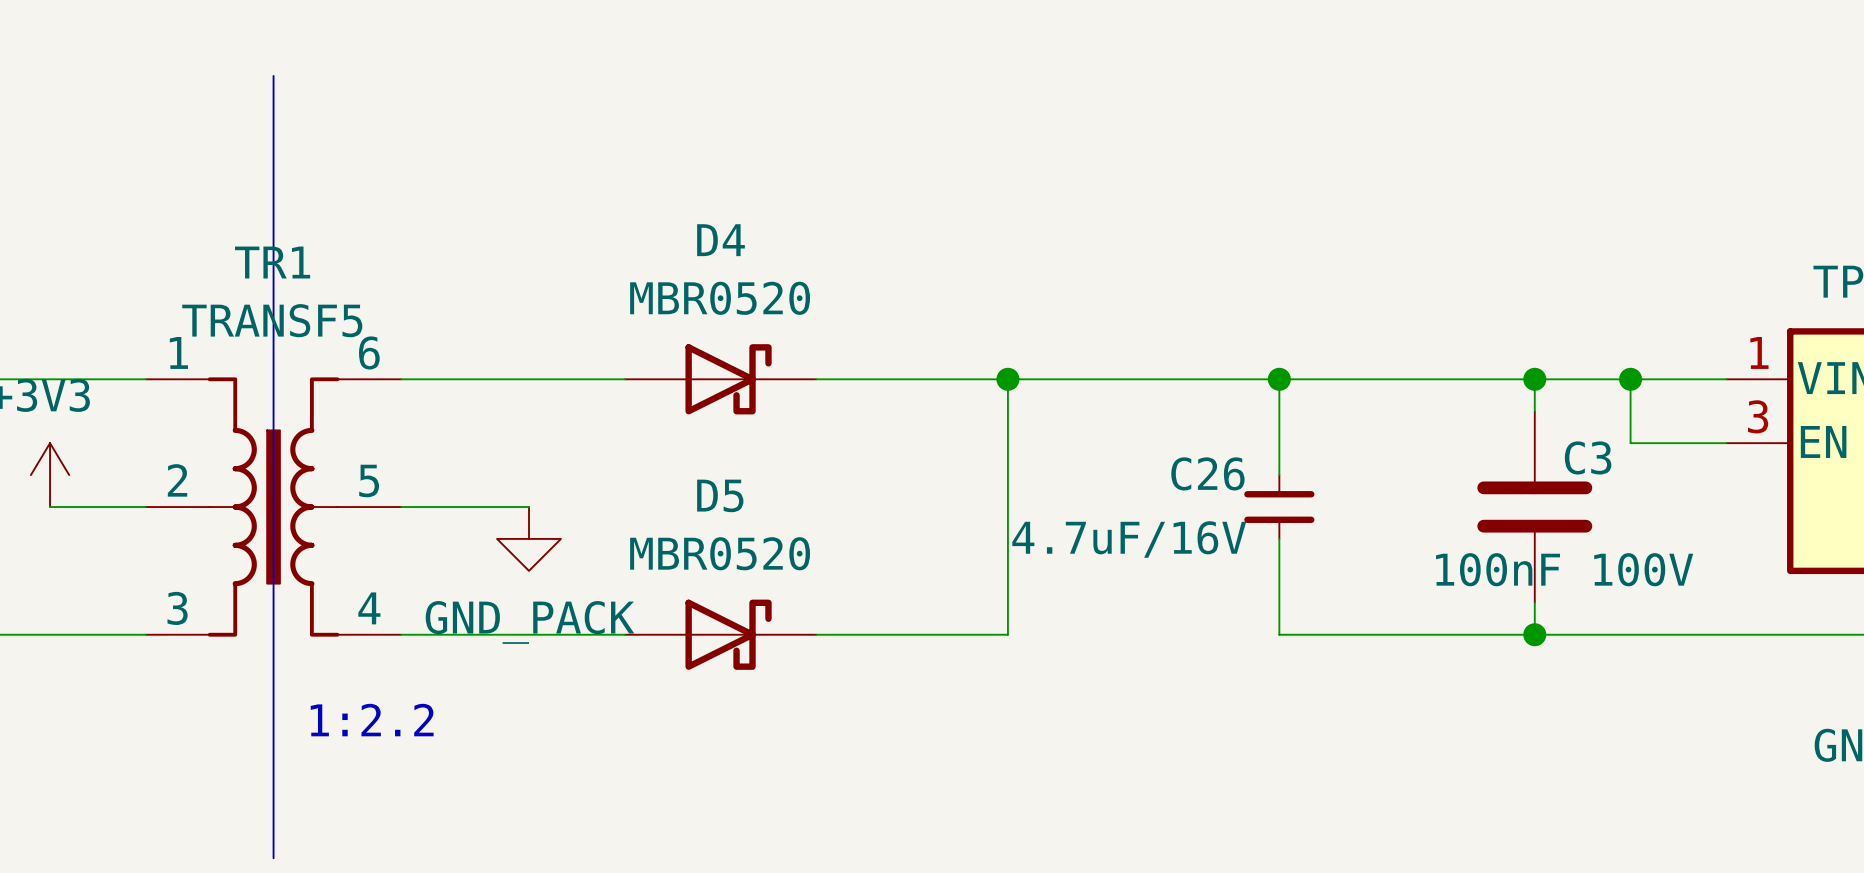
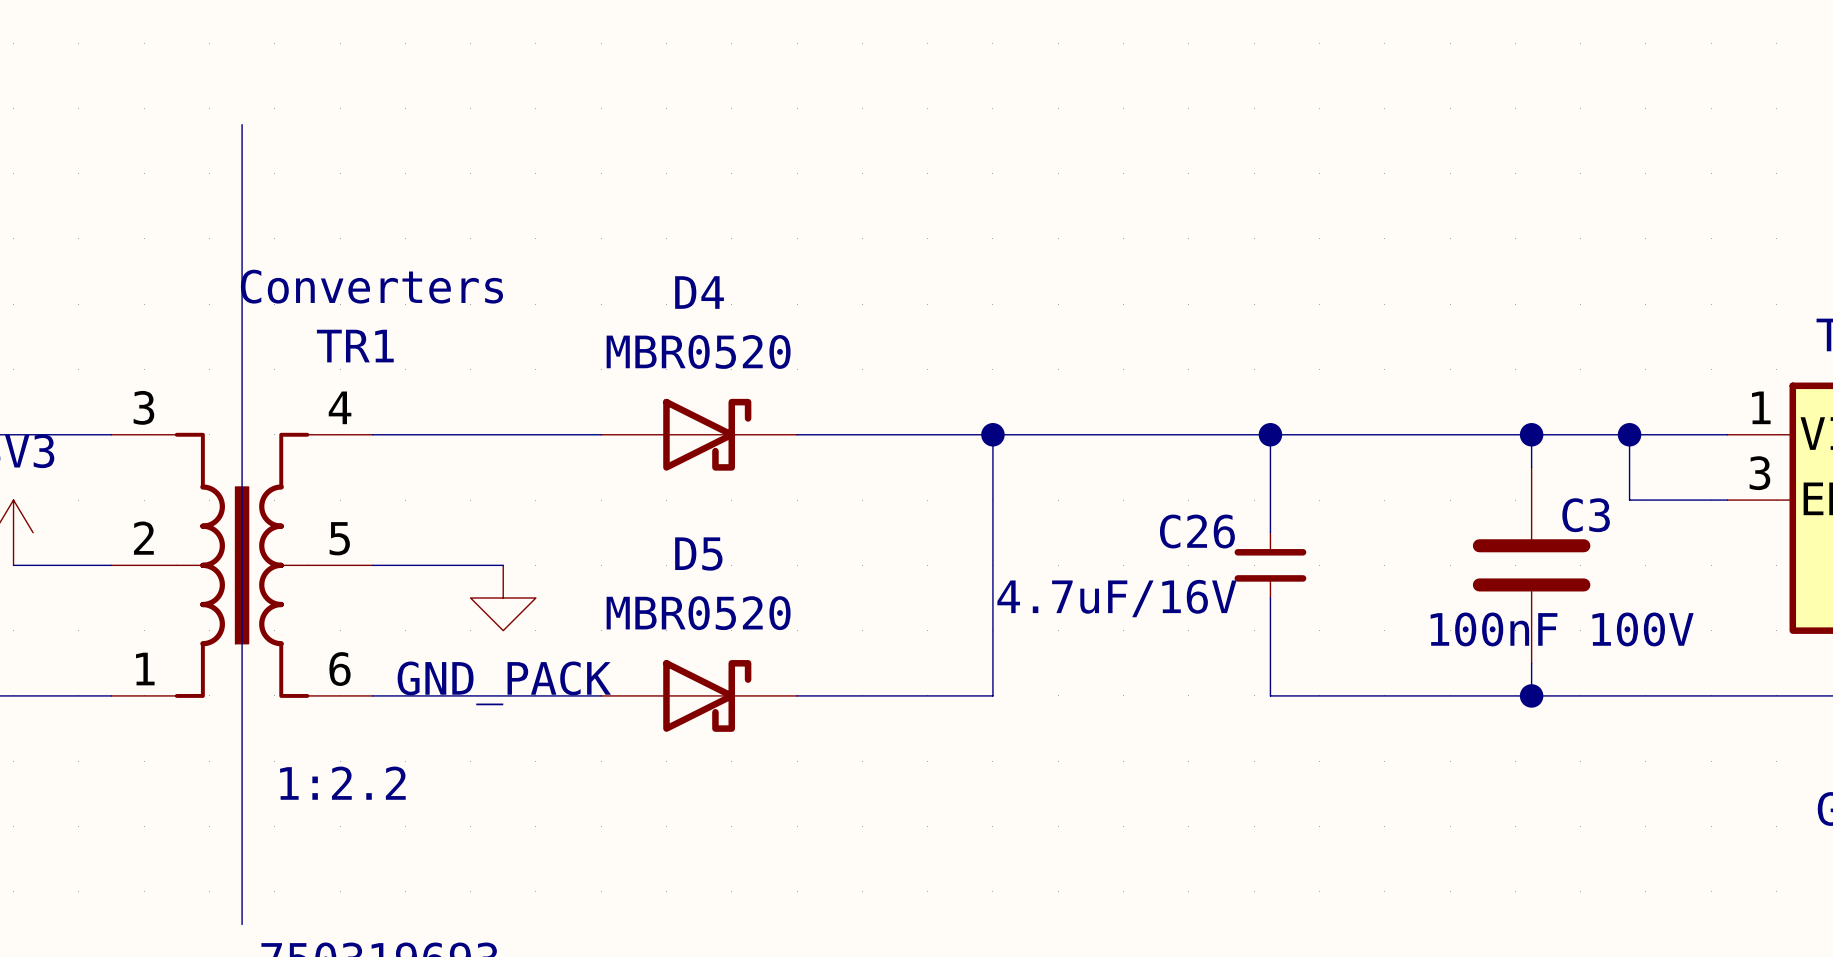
TR1 name position: TR1 (272, 262) -> TR1 (355, 346)
TR1 value: TRANSF5 (272, 320) -> Converters (371, 286)
TR1 flip: as is (273, 507) -> up-down (242, 565)

